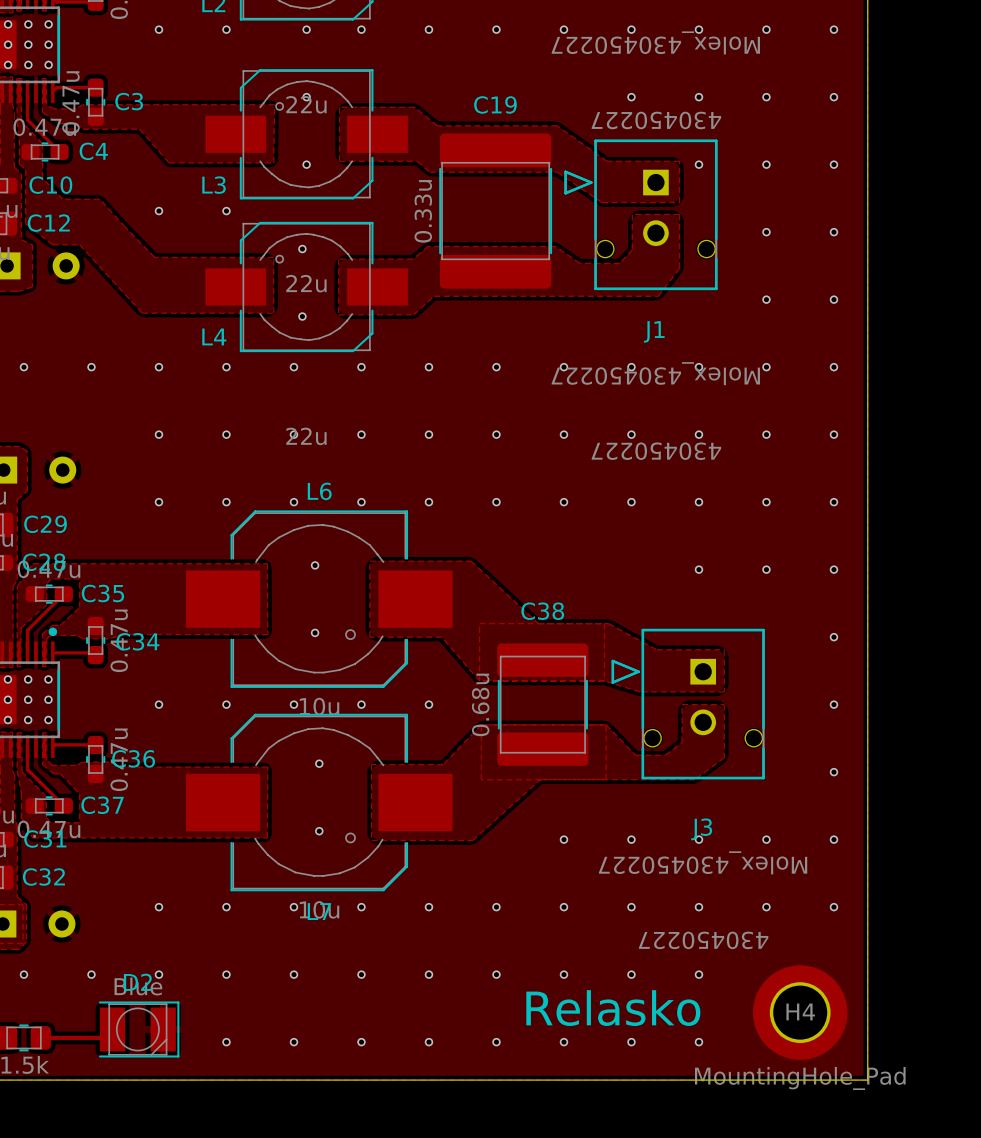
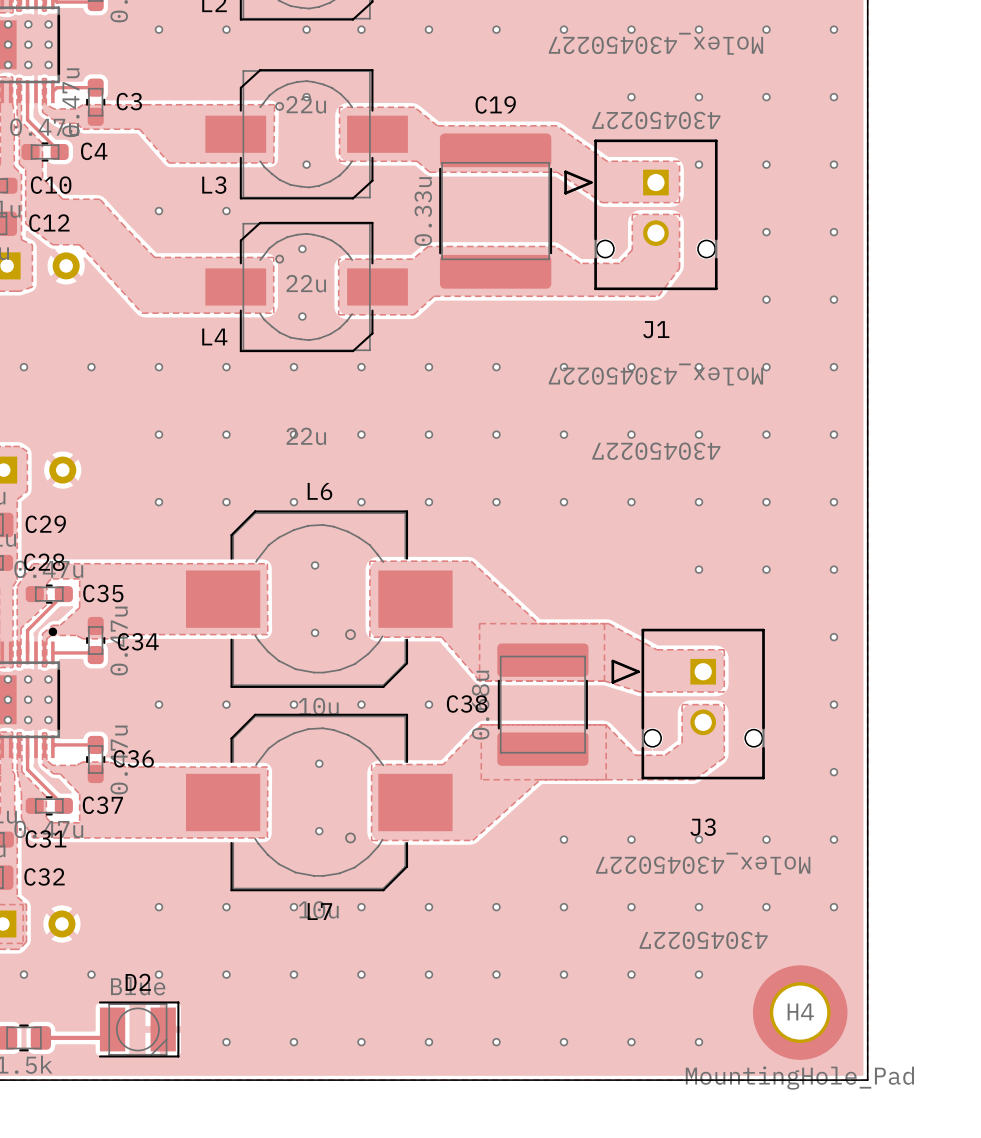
C38 name position: C38 (542, 611) -> C38 (467, 704)
text: Relasko (613, 1008) -> none

